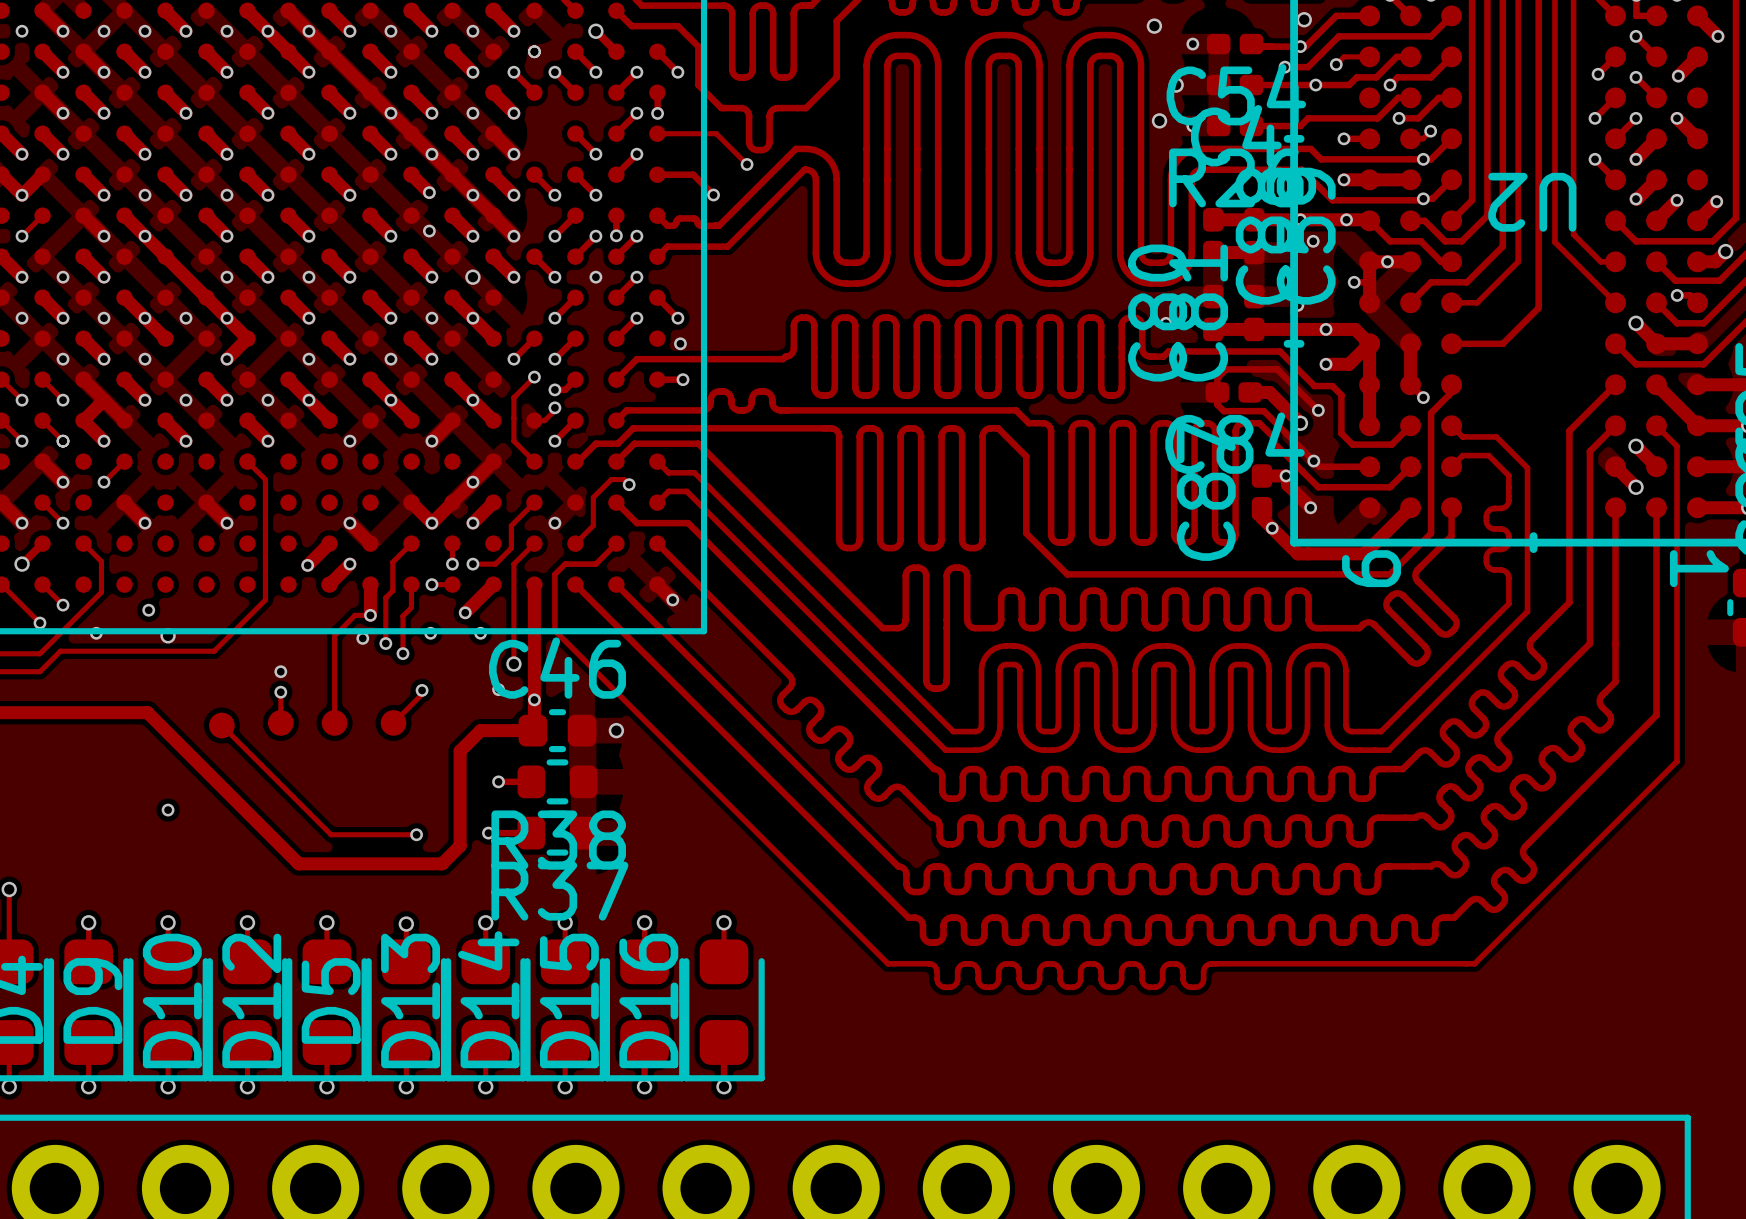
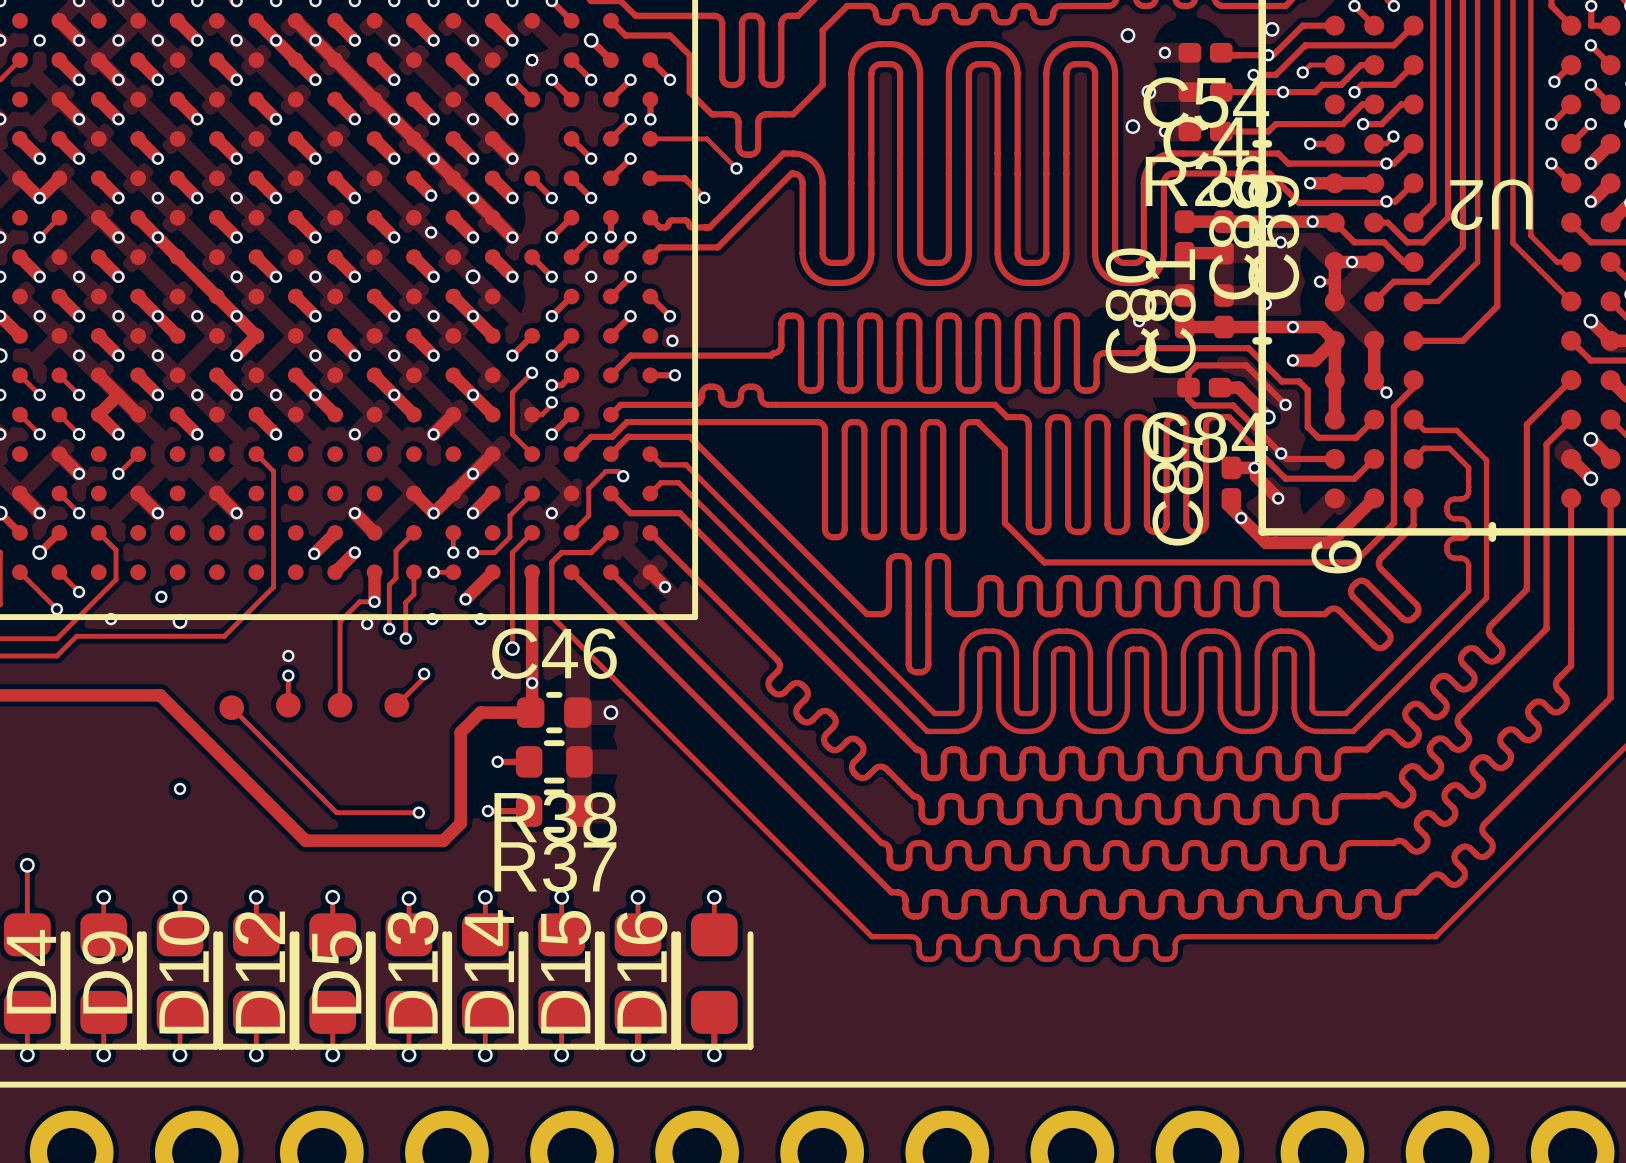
track: (1150, 356) (1145, 354) (1142, 350) (1141, 321) (1136, 317) (1127, 317) (1121, 324) (1121, 364) -> (1124, 353) (1102, 353) (1098, 356) (1096, 361)

